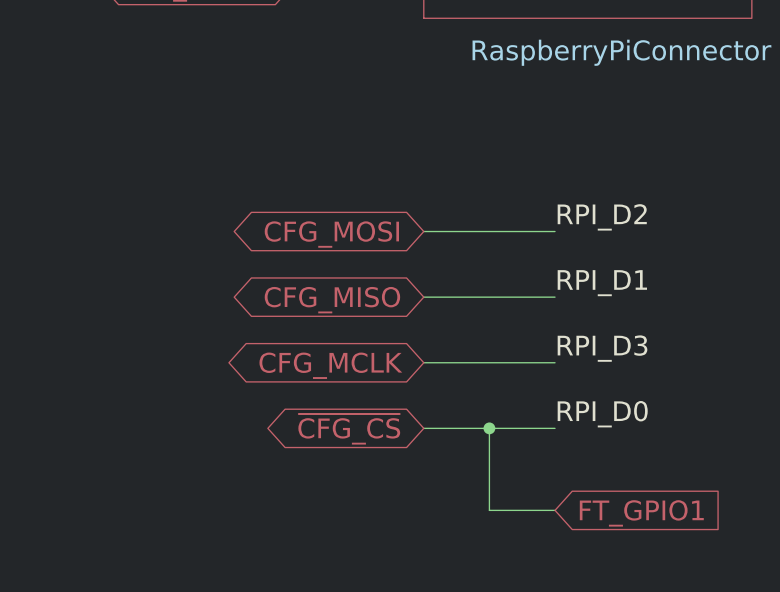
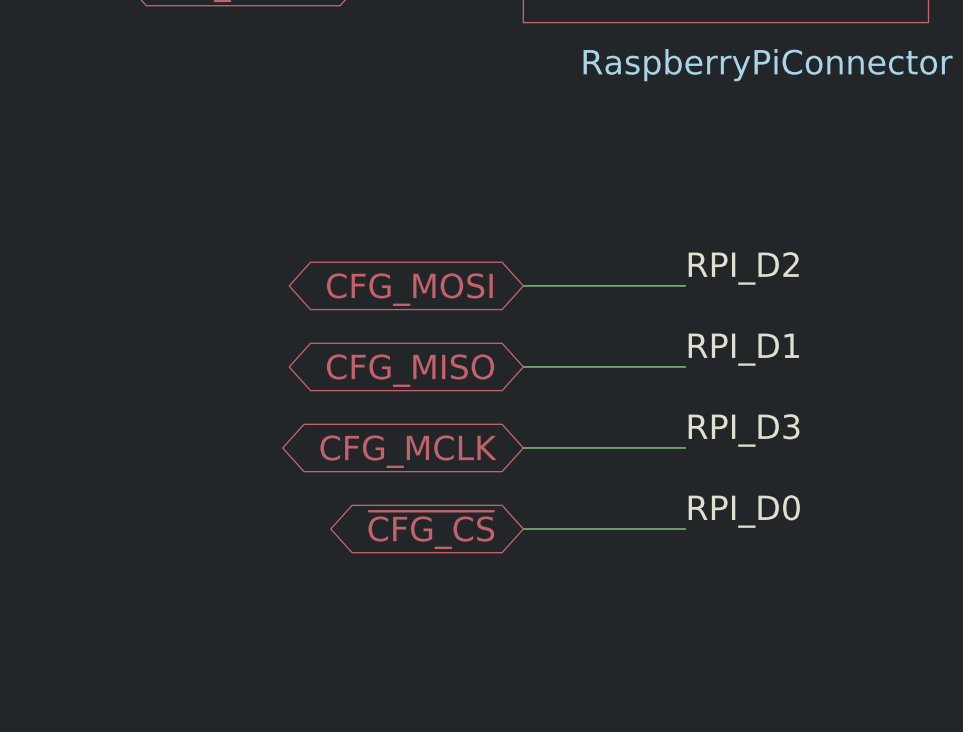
wire: (489, 428) (489, 510) (555, 510) -> none
junction: (489, 428) -> none
global label: FT_GPIO1 (641, 513) -> none

